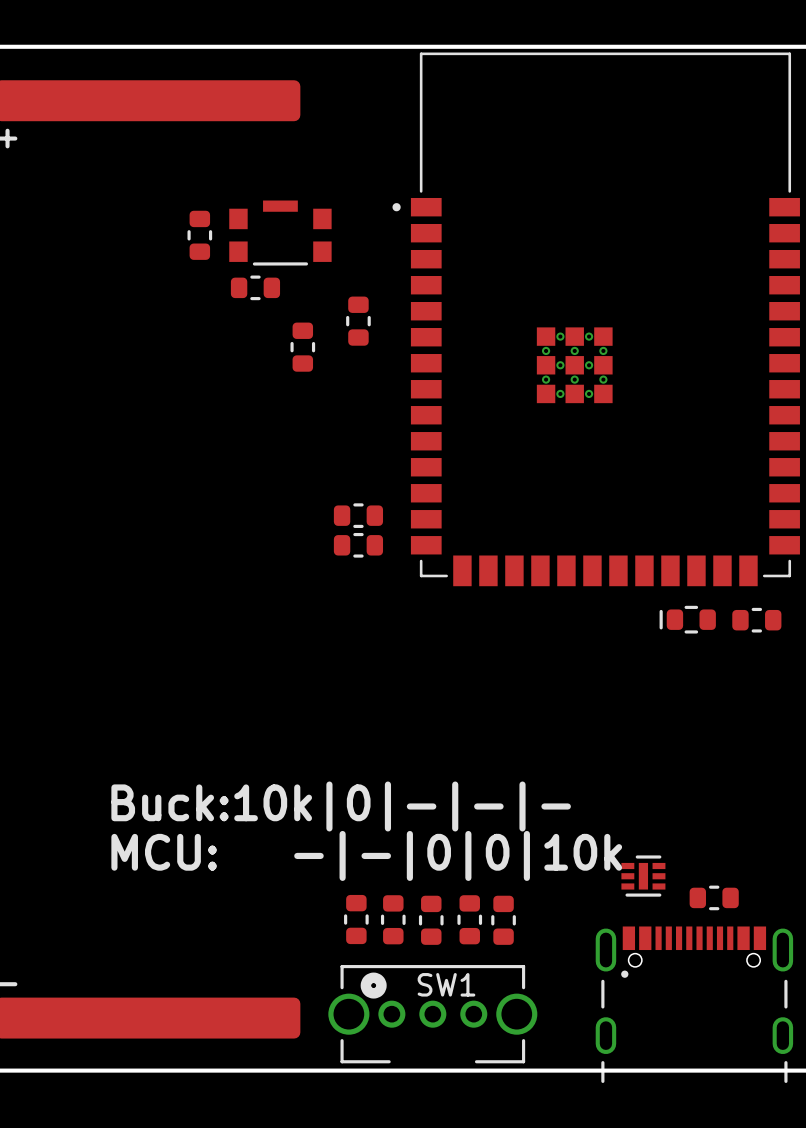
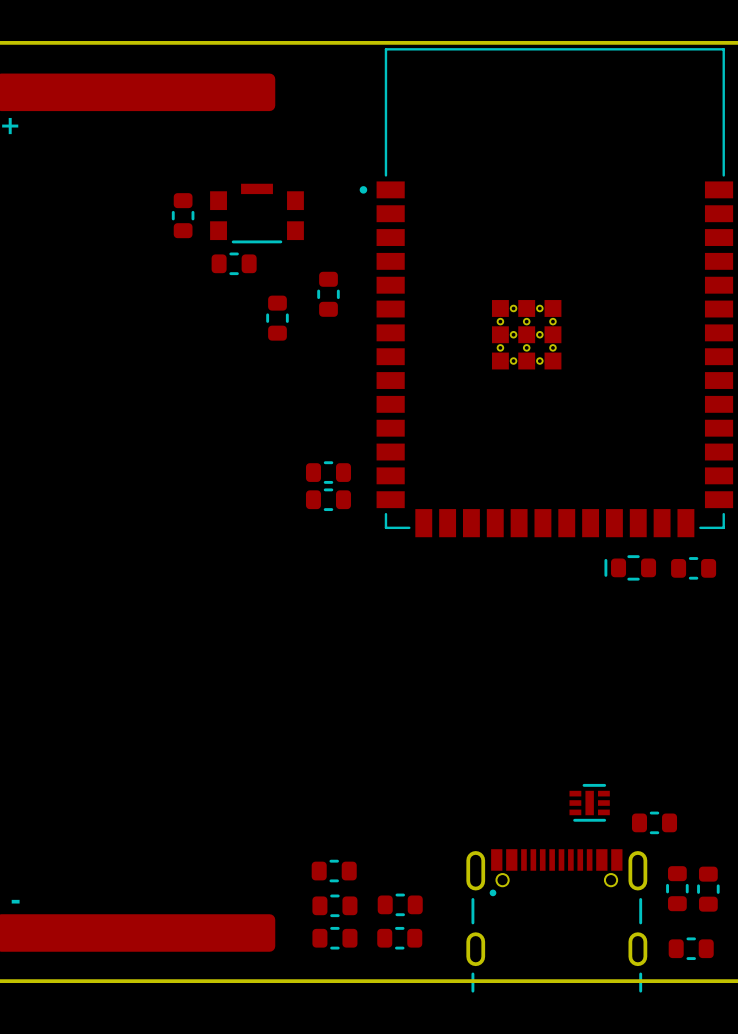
text: Buck:10k|0|-|-|- (341, 806) -> none
text: MCU: -|-|0|0|10k (366, 855) -> none
part: (356, 919) -> none
part: (393, 919) -> none
part: (469, 919) -> none
part: (431, 920) -> none
part: (503, 920) -> none
part: none -> (334, 871)
part: none -> (677, 888)
part: none -> (708, 889)
part: none -> (400, 904)
part: none -> (334, 905)
part position: (694, 1004) -> (556, 920)
SW1: (432, 1014) -> none
part: none -> (334, 938)
part: none -> (399, 938)
part: none -> (691, 948)

